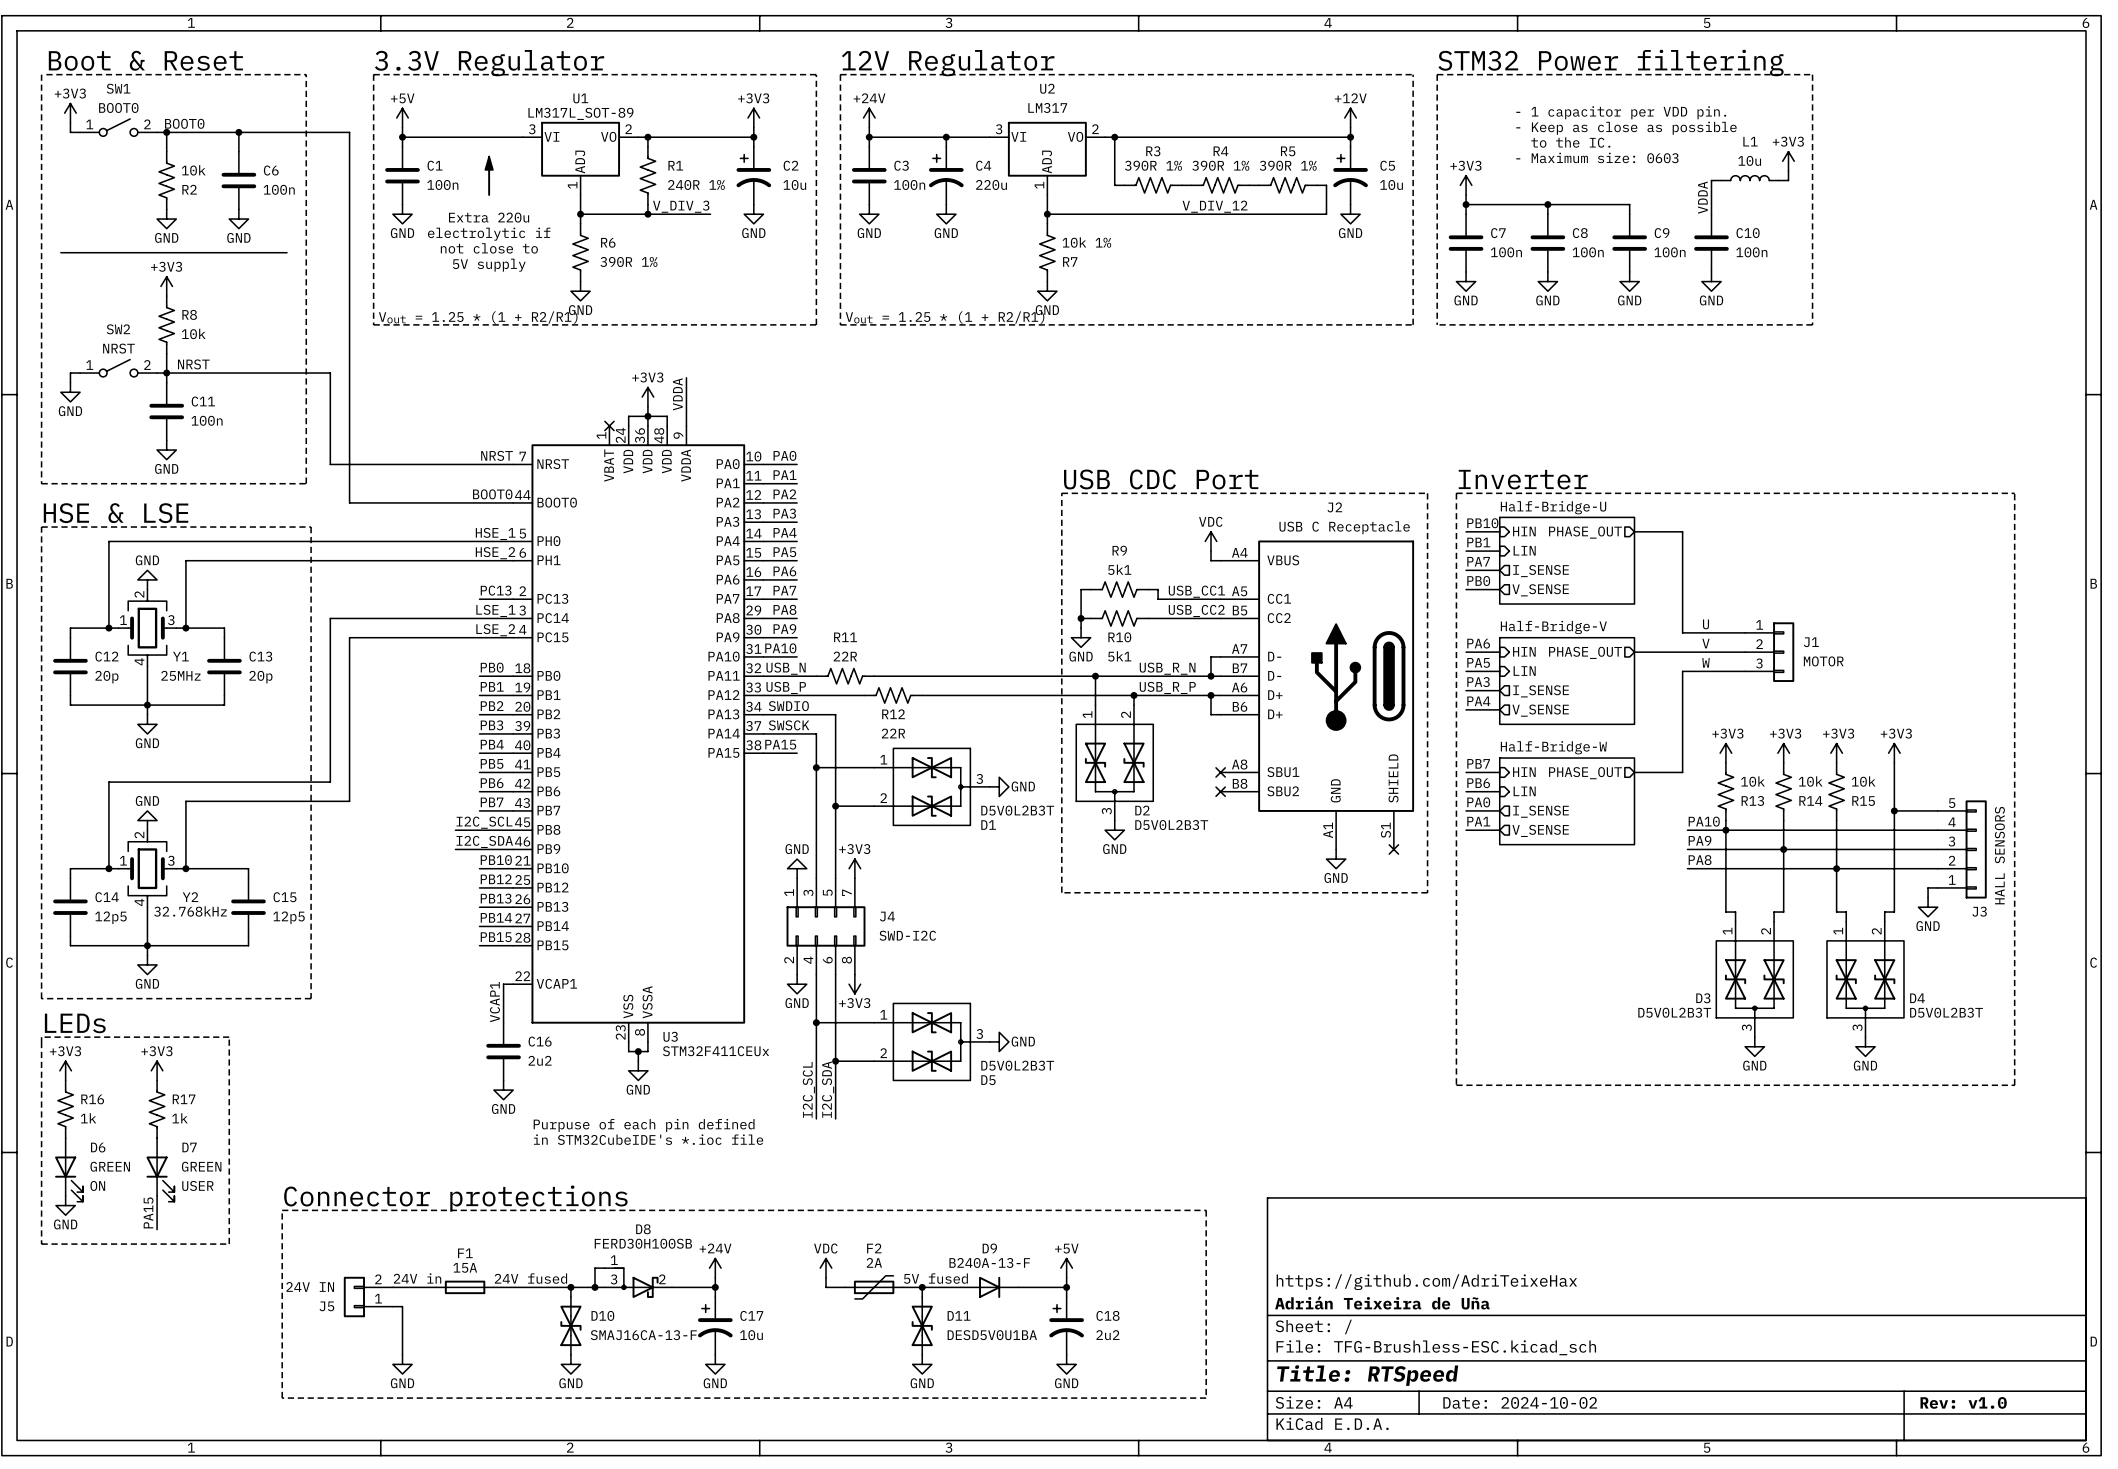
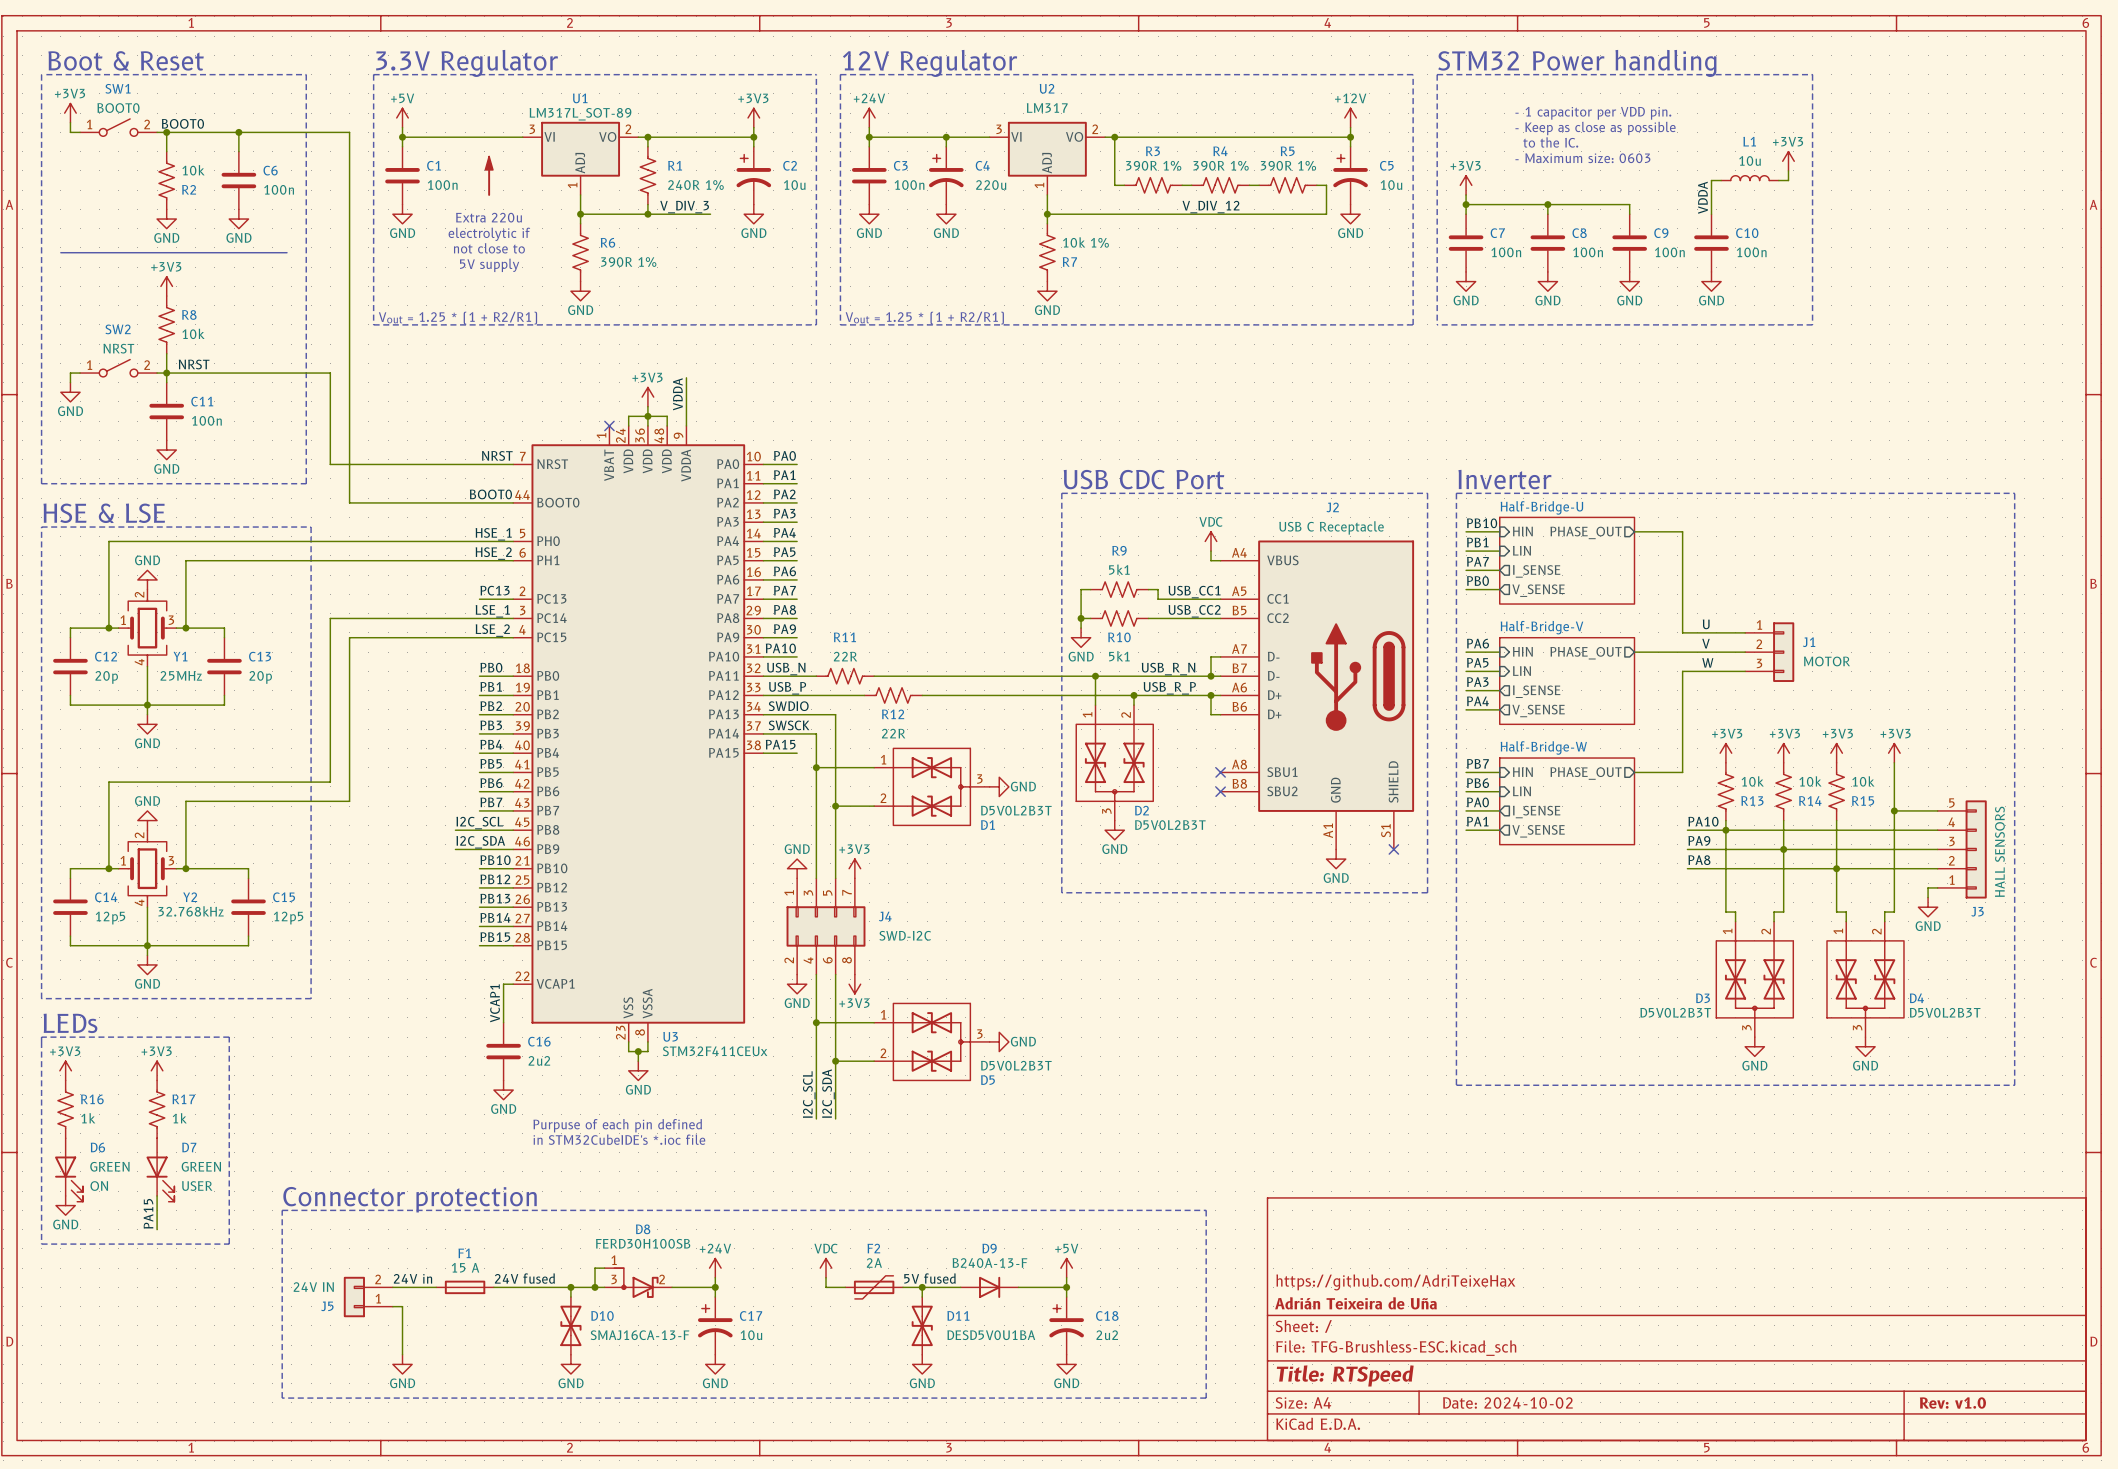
text: STM32 Power filtering (1611, 63) -> STM32 Power handling (1577, 63)
text: Connector protections (455, 1198) -> Connector protection (410, 1199)
F1 value: 15A (465, 1267) -> 15 A (465, 1267)

